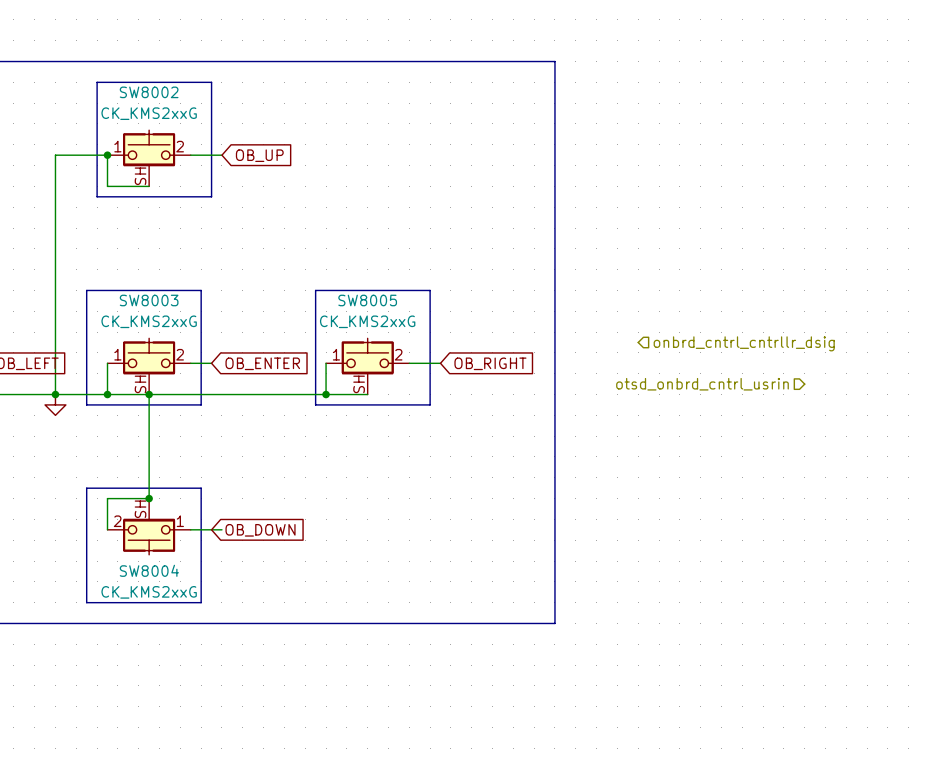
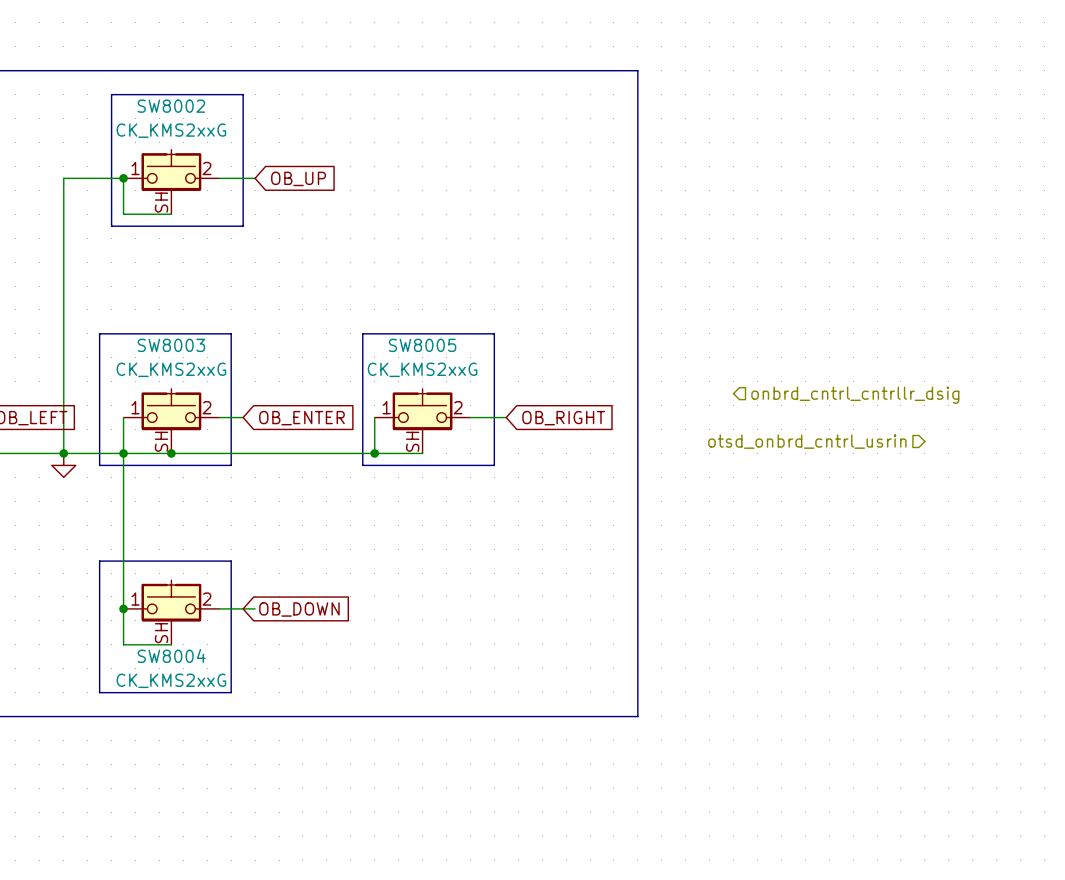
wire: (149, 394) (149, 498) (107, 498) -> (123, 453) (123, 573)
junction: (149, 498) -> none
wire: none -> (123, 608) (123, 644) (171, 644)
junction: none -> (123, 608)
SW8004 rotation: 0° (149, 537) -> 180° (171, 600)

